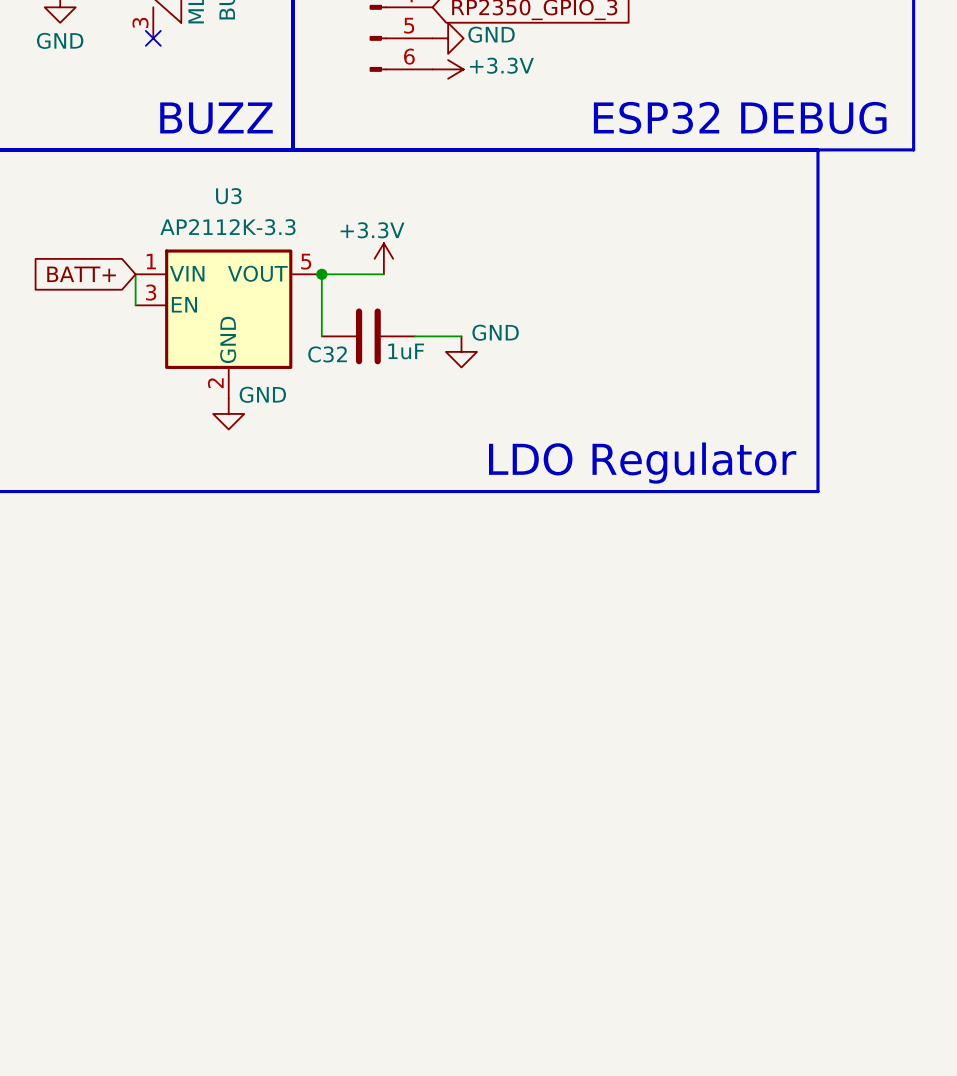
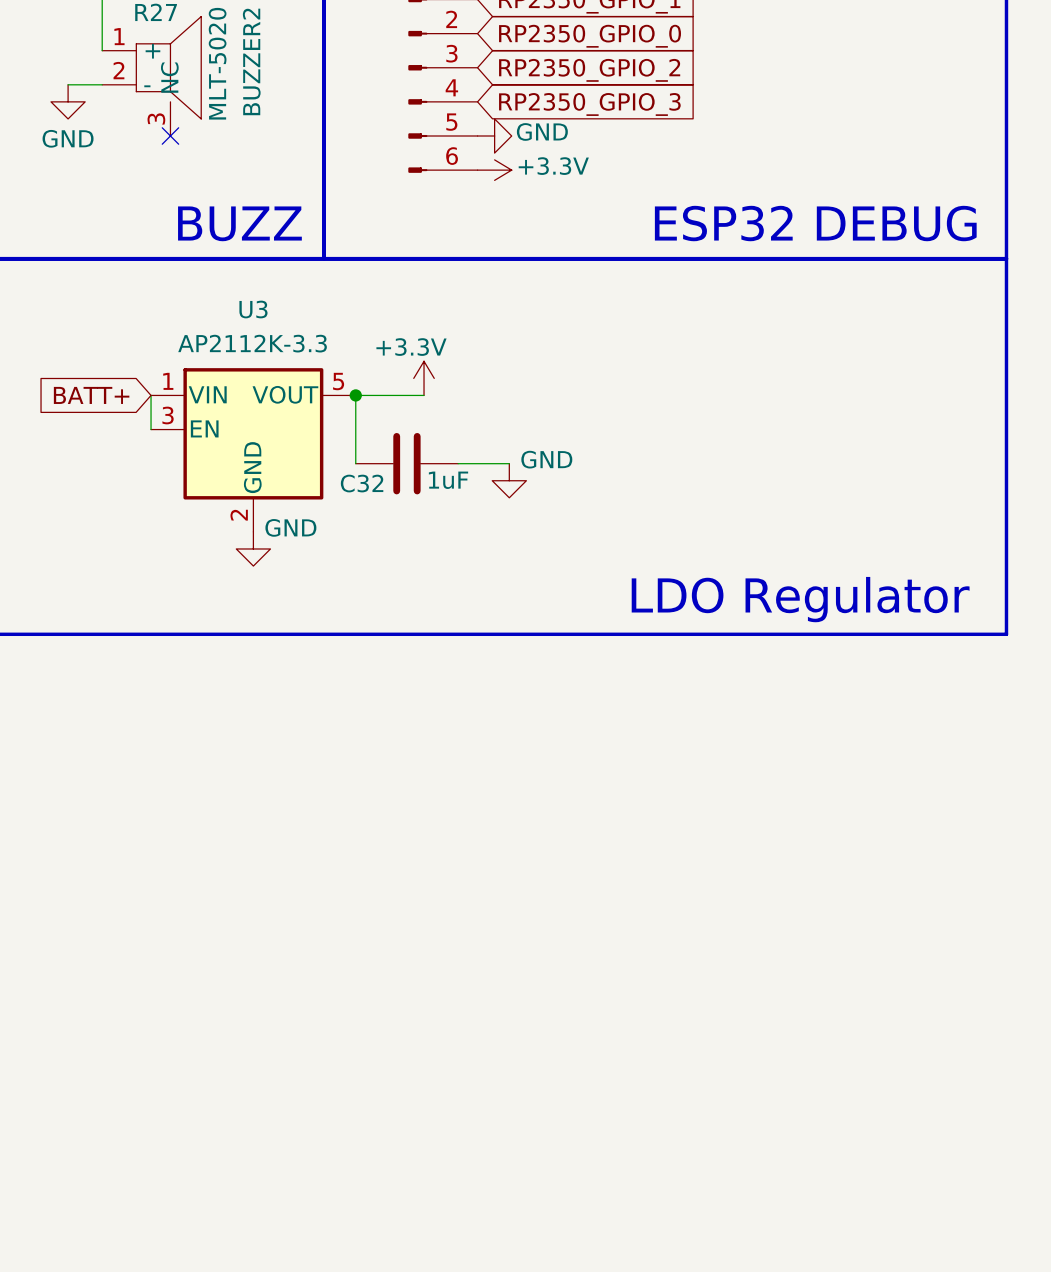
line: (817, 150) (817, 491) -> (901, 258) (1006, 258) (1006, 634) (901, 634)
text position: LDO Regulator (642, 463) -> LDO Regulator (800, 599)

